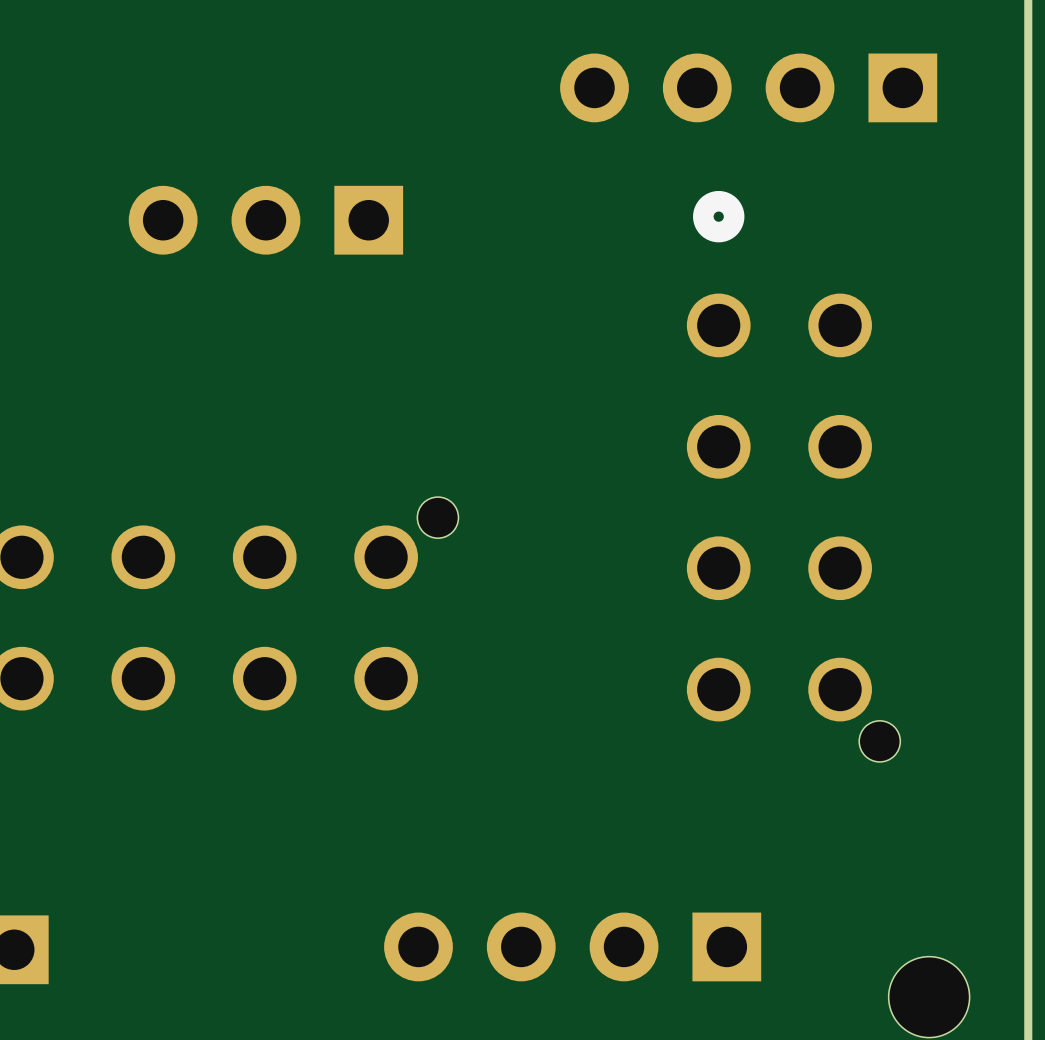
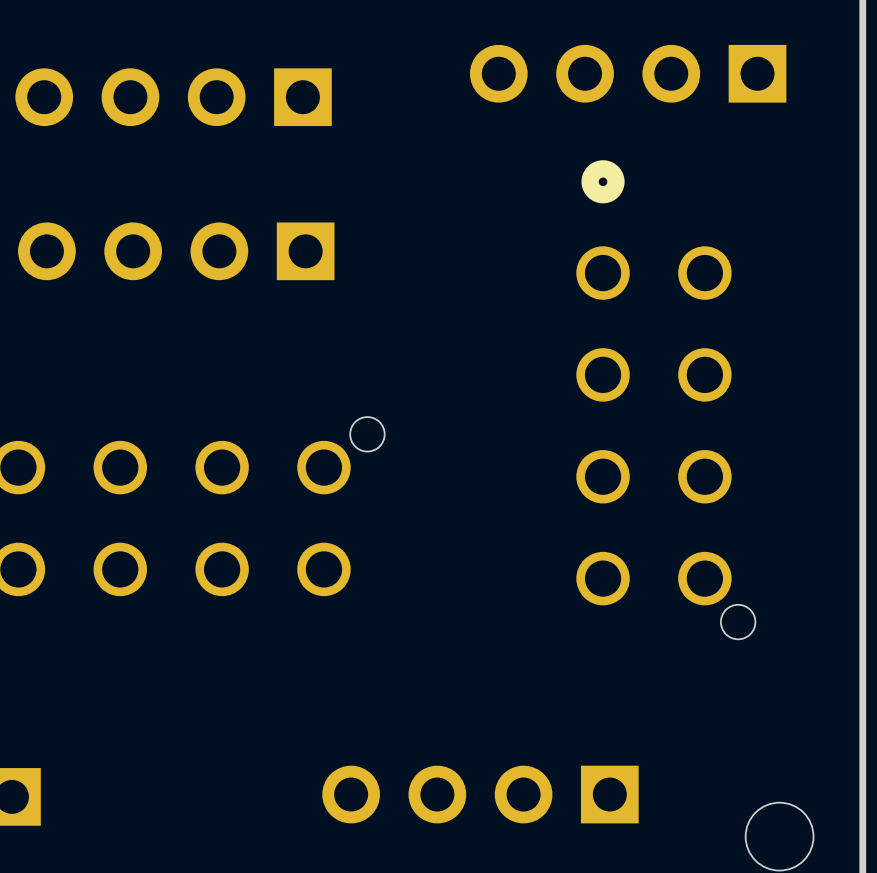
part: none -> (173, 97)
part: (265, 220) -> none
part: none -> (176, 251)

